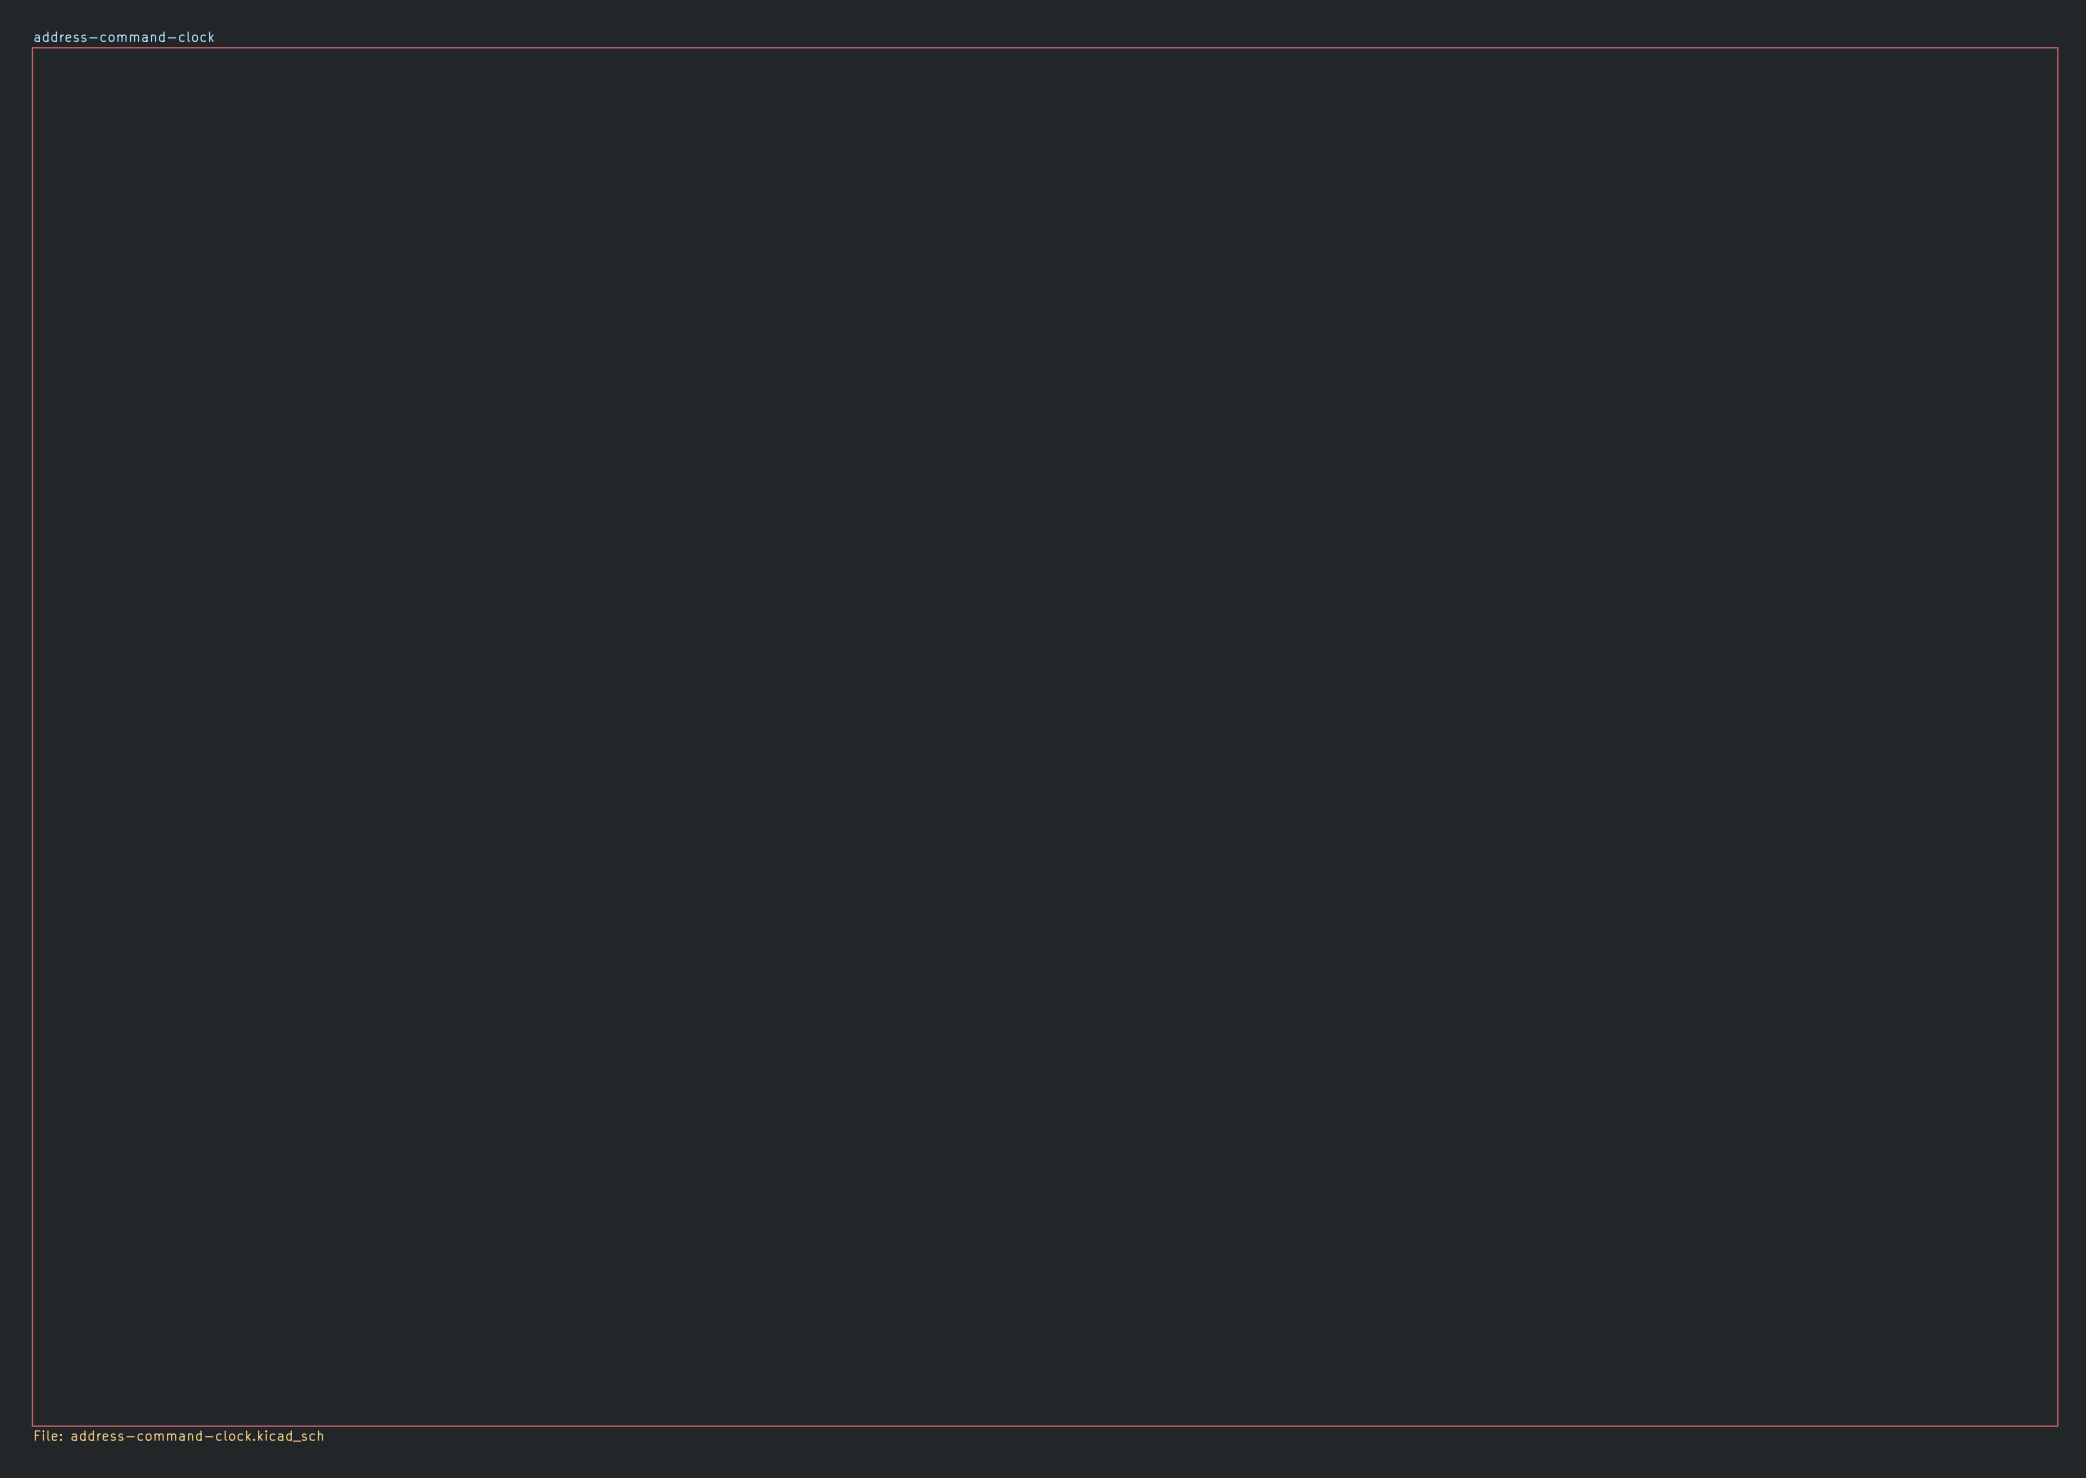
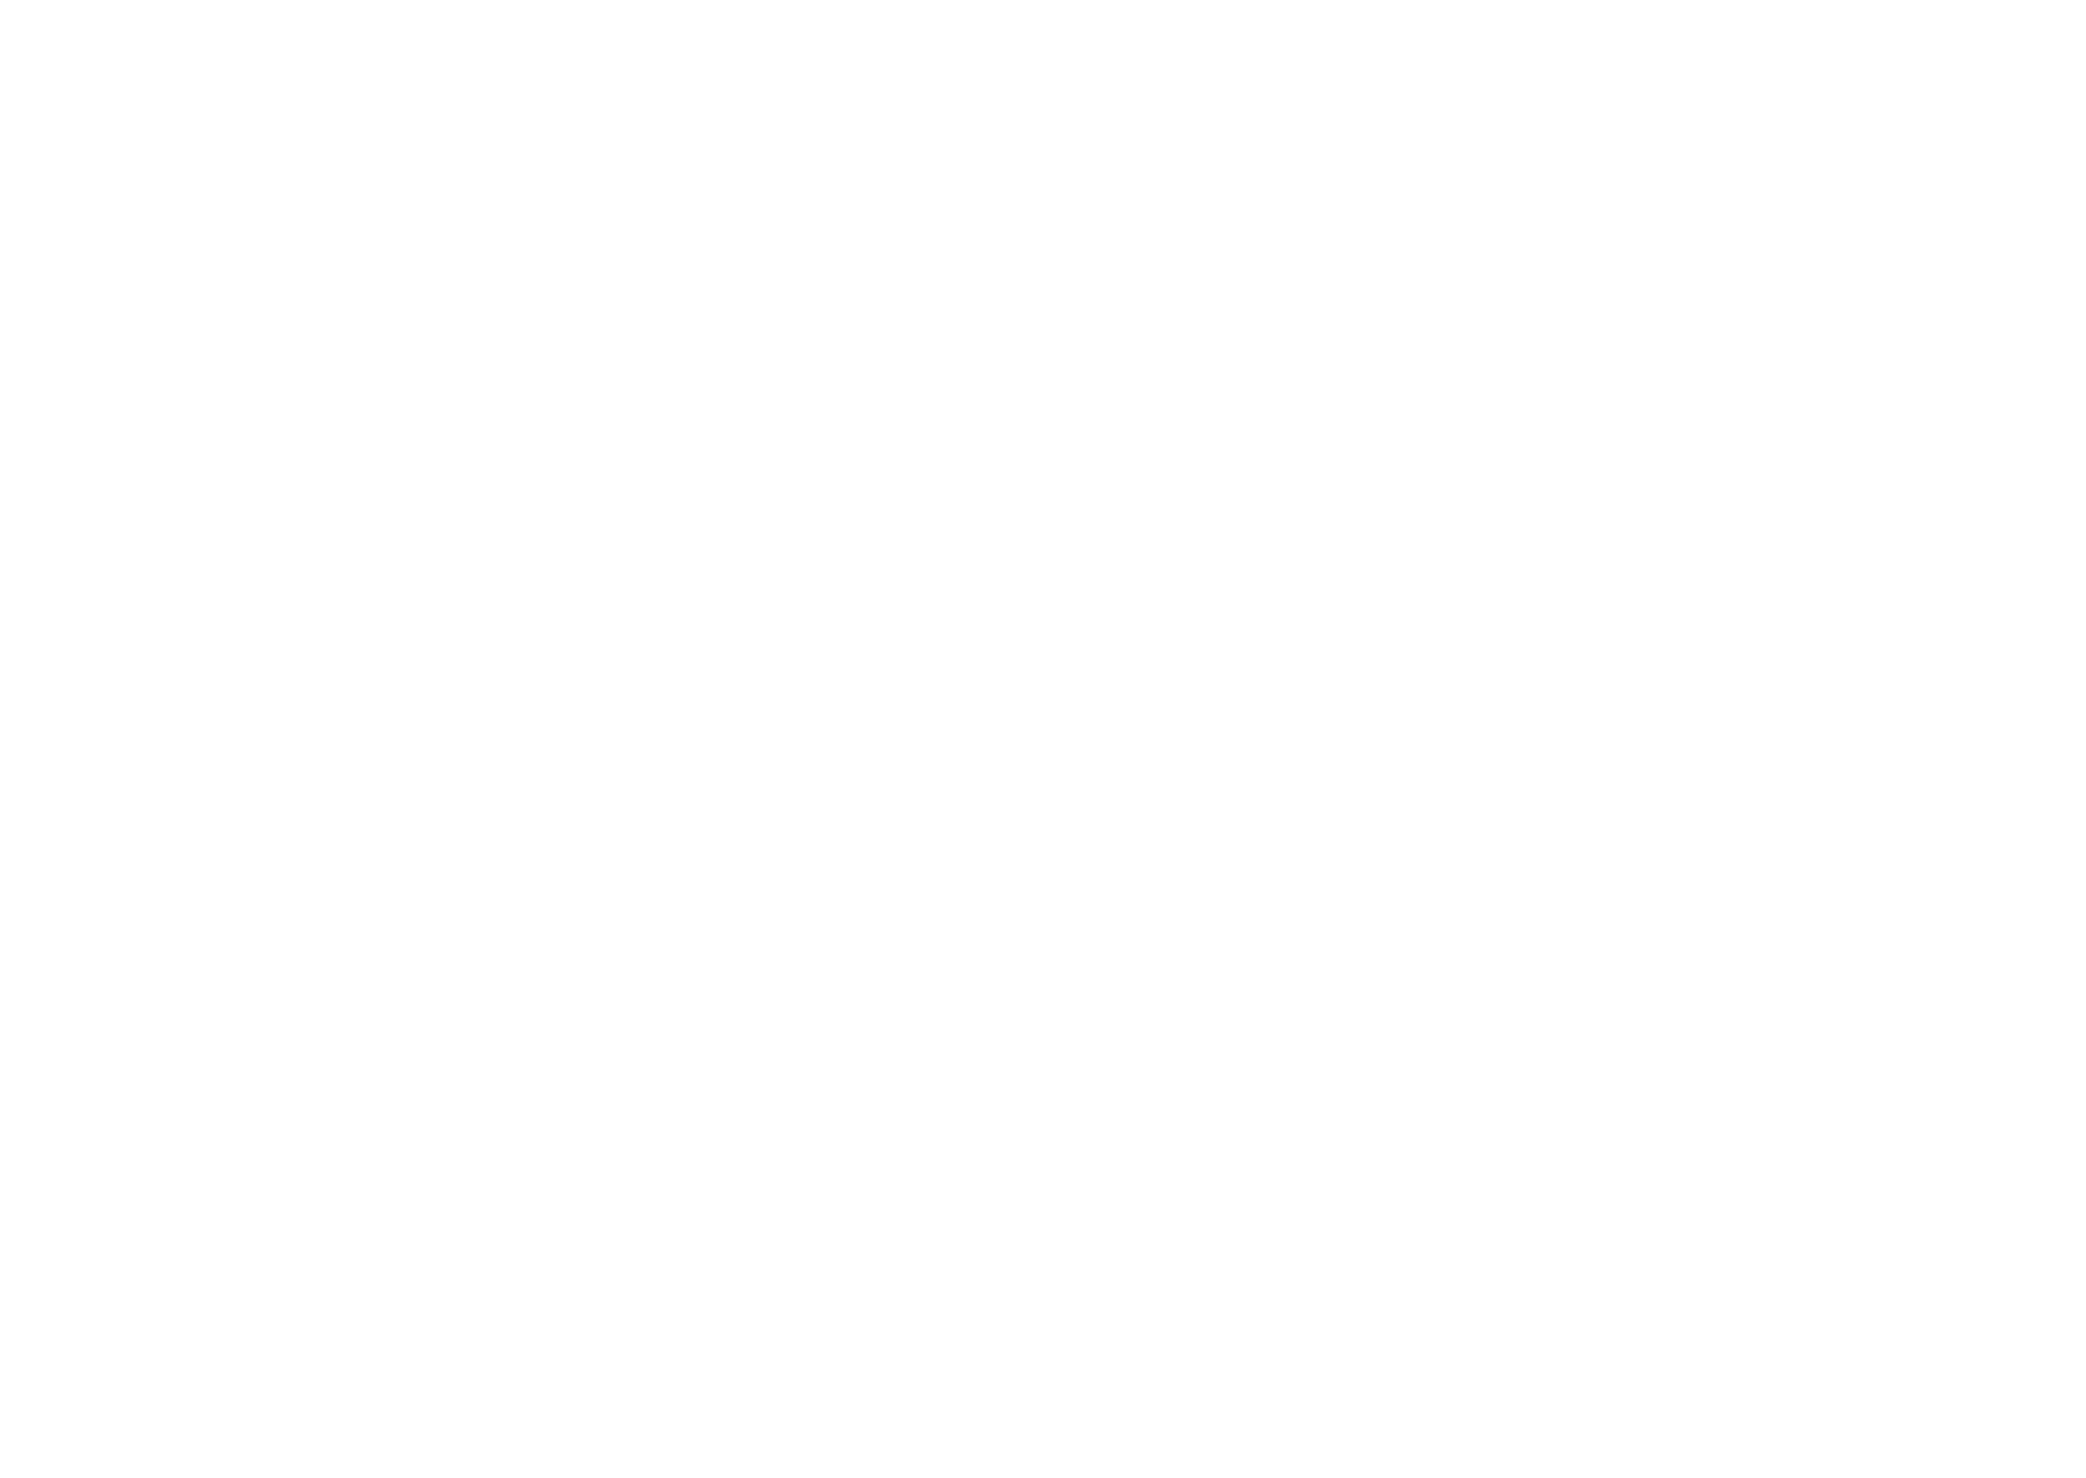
sheet address-command-clock: File: address-command-clock.kicad_sch (1045, 736) -> none

